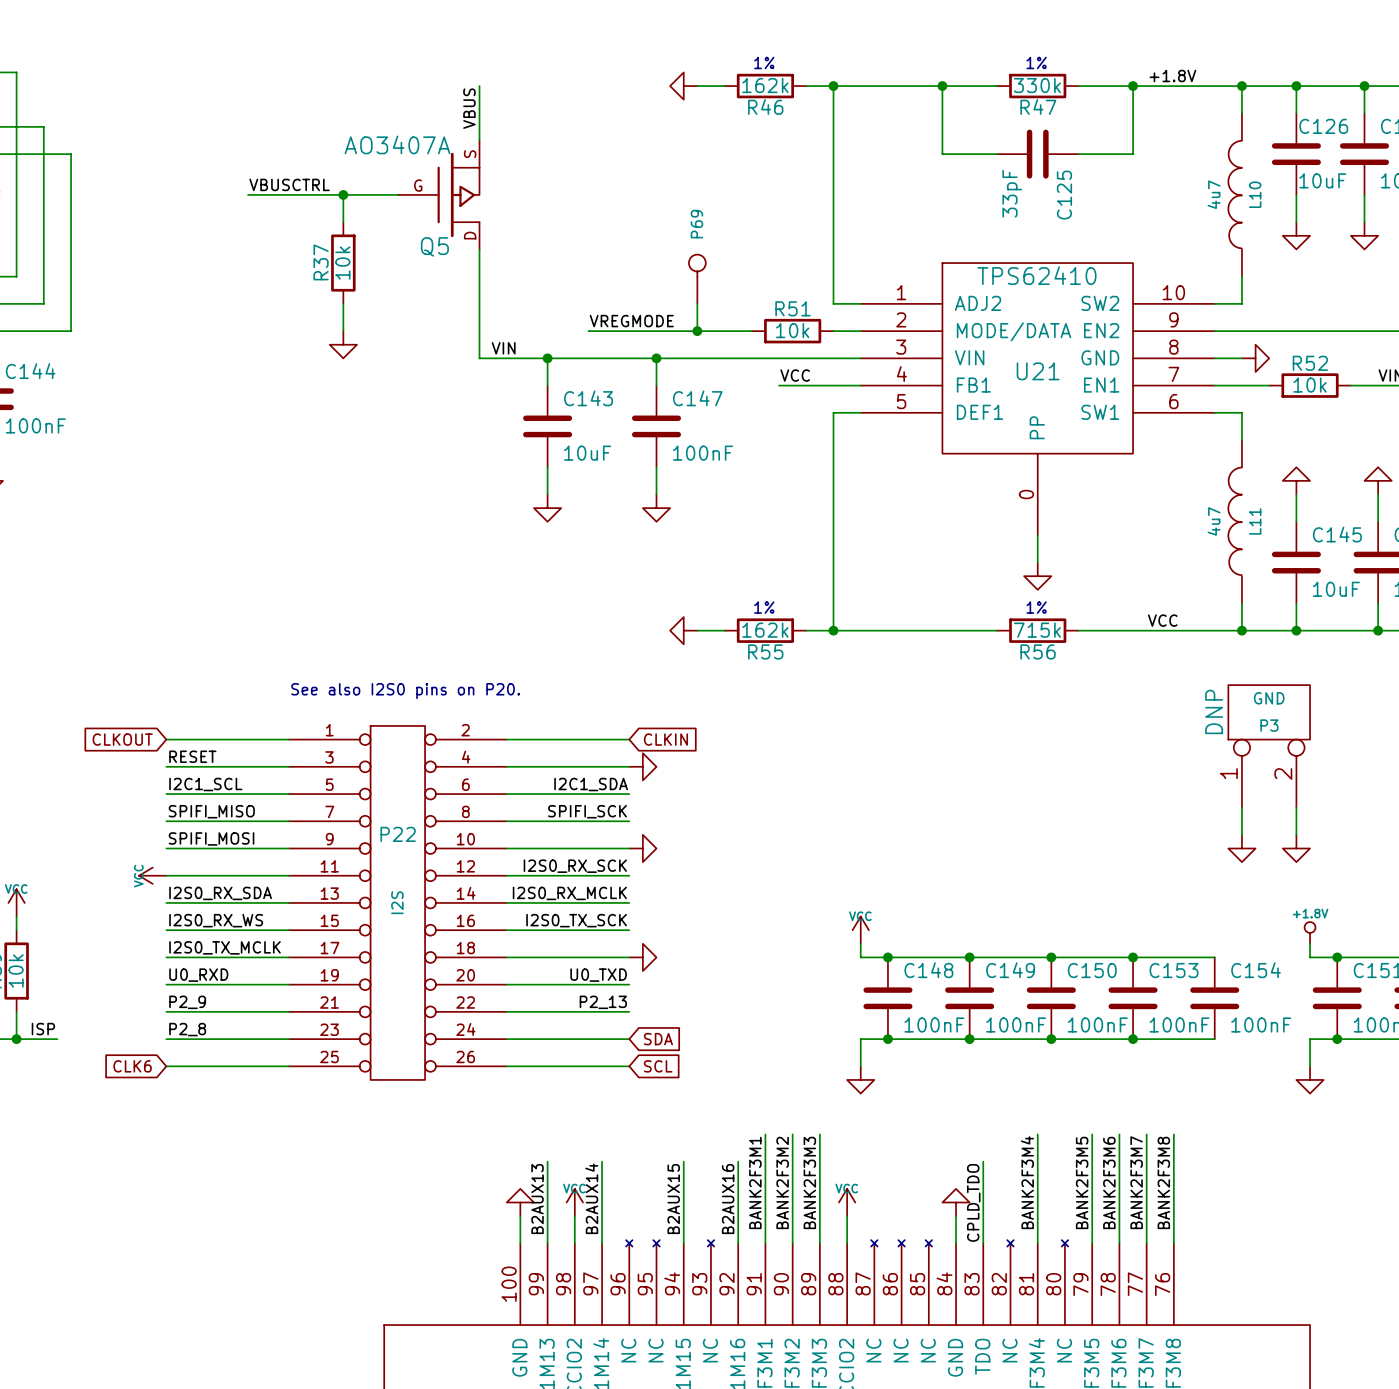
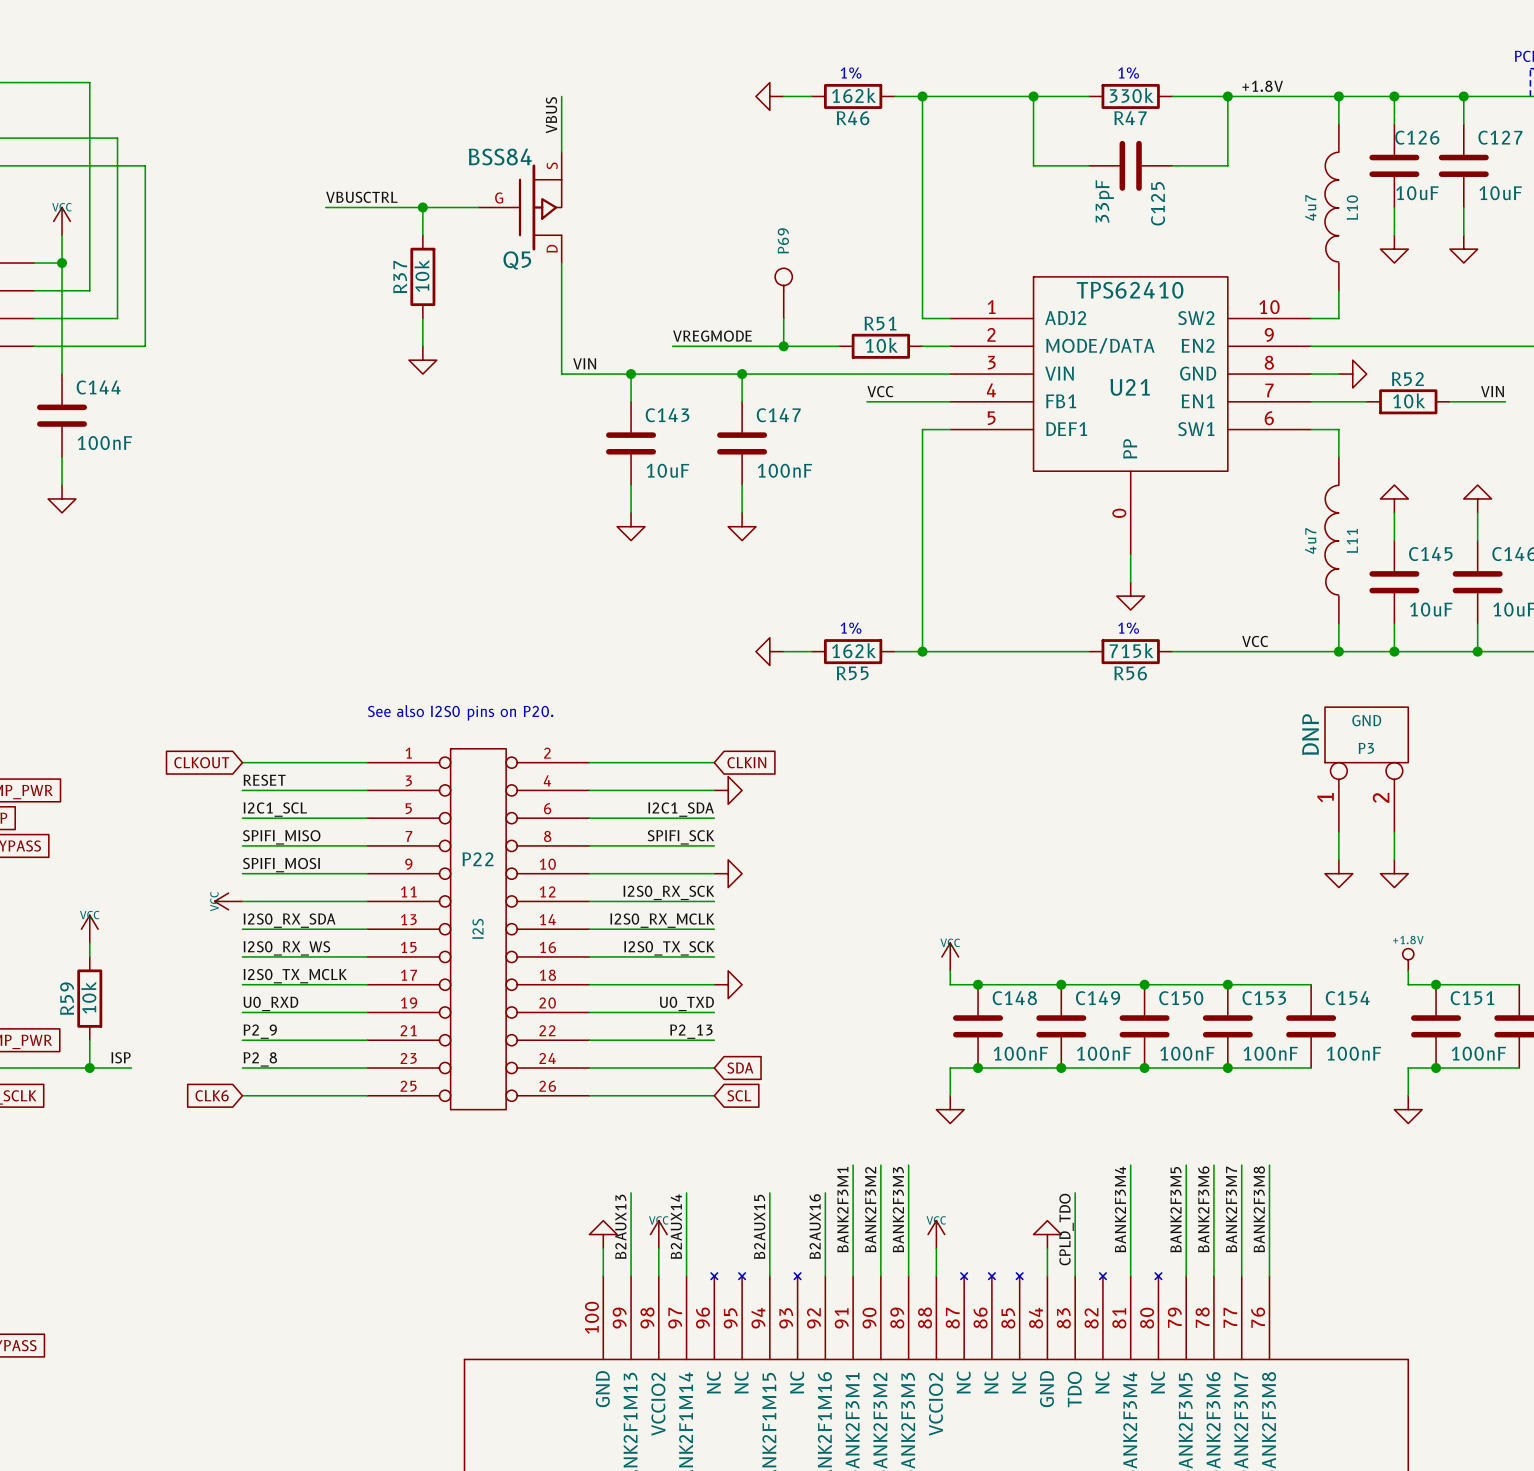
Q5 value: AO3407A (397, 144) -> BSS84 (500, 157)

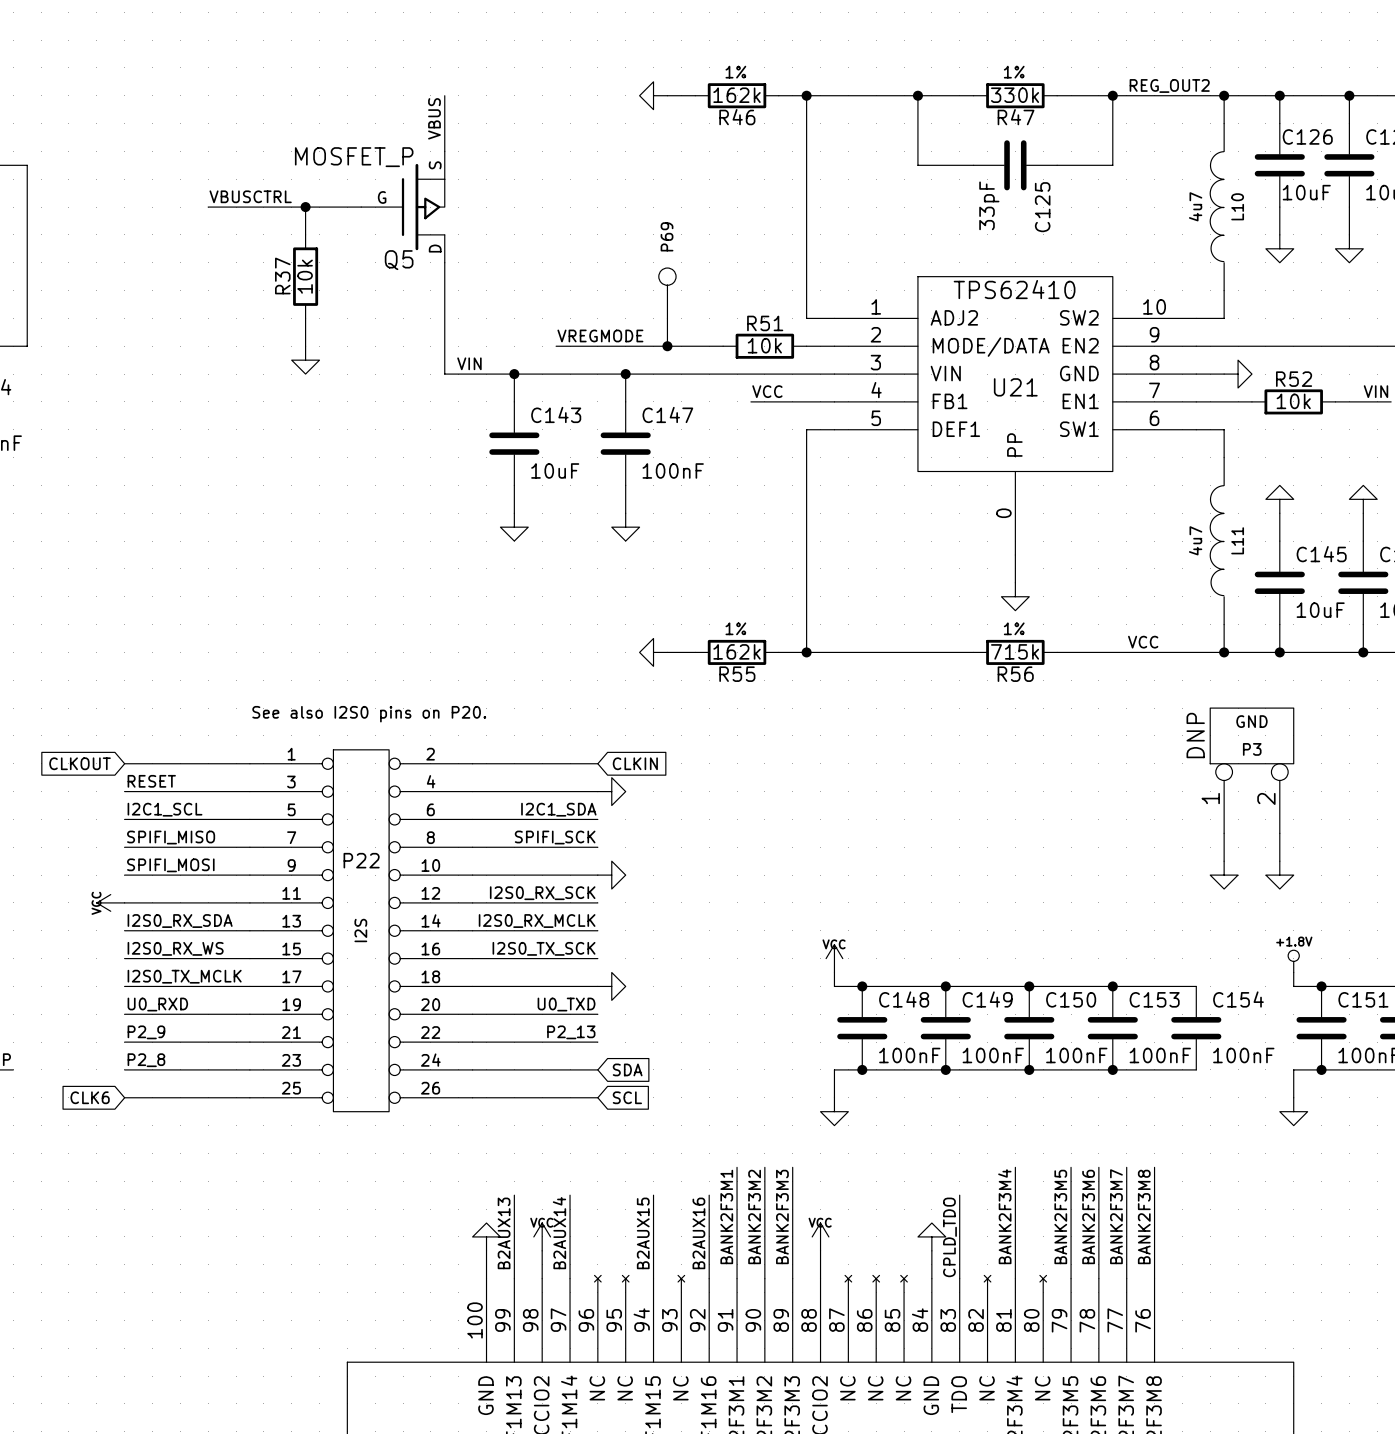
label: +1.8V (1262, 86) -> REG_OUT2 (1169, 85)
Q5 value: BSS84 (500, 157) -> MOSFET_P (354, 157)

